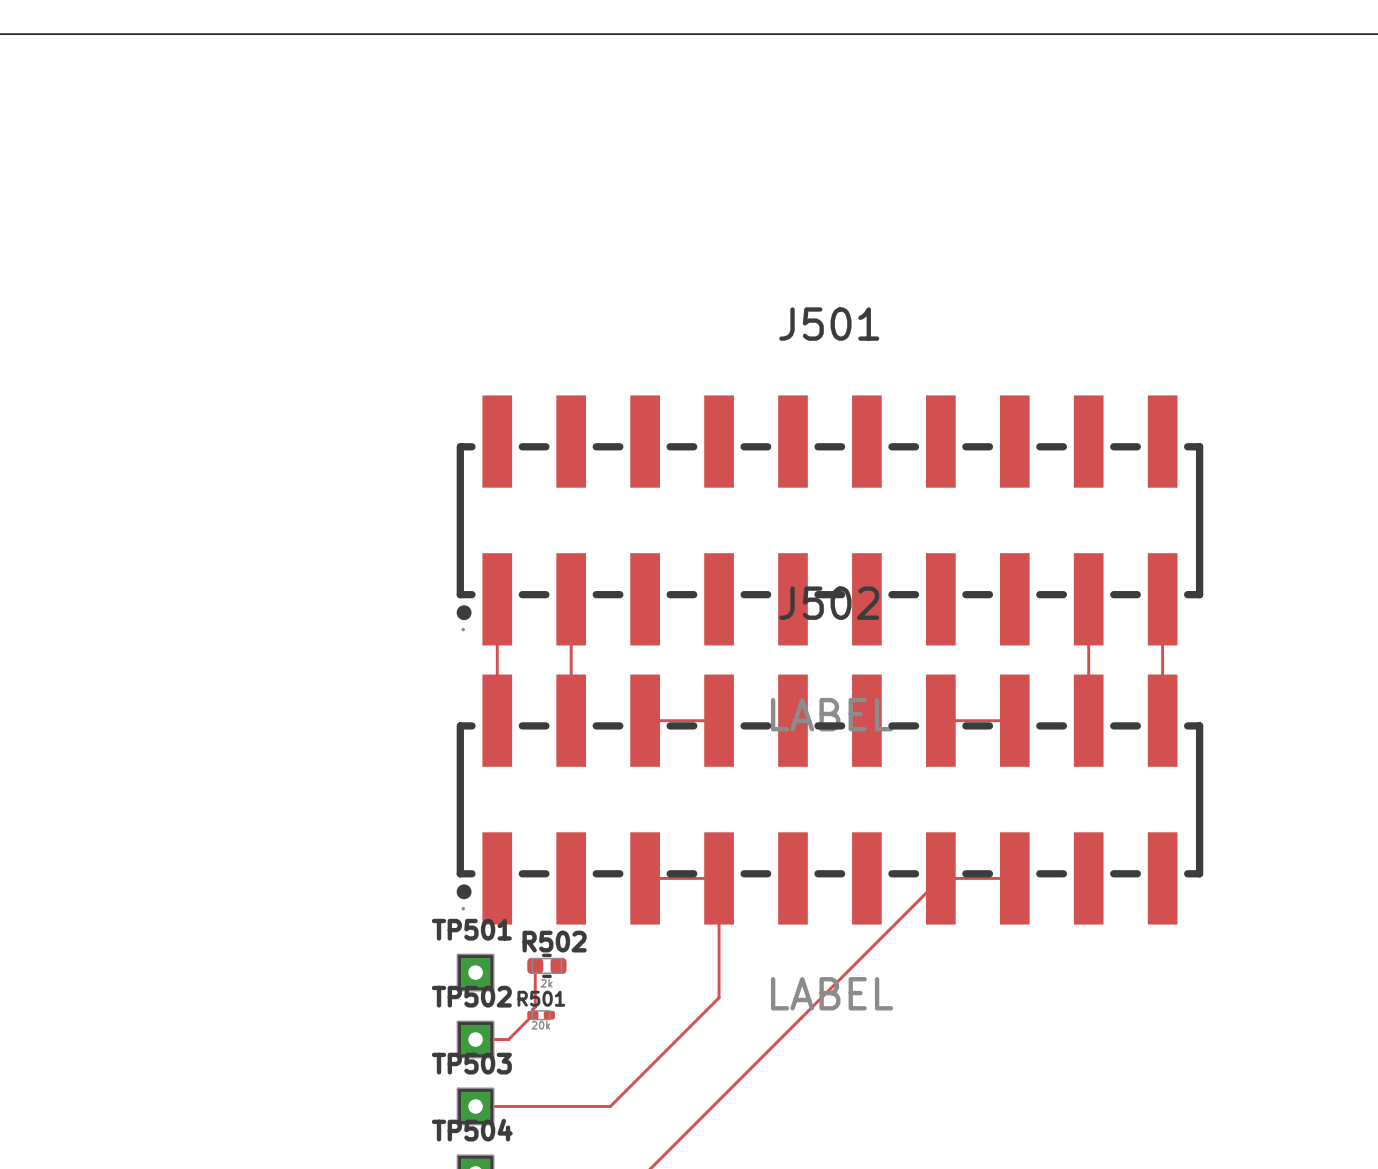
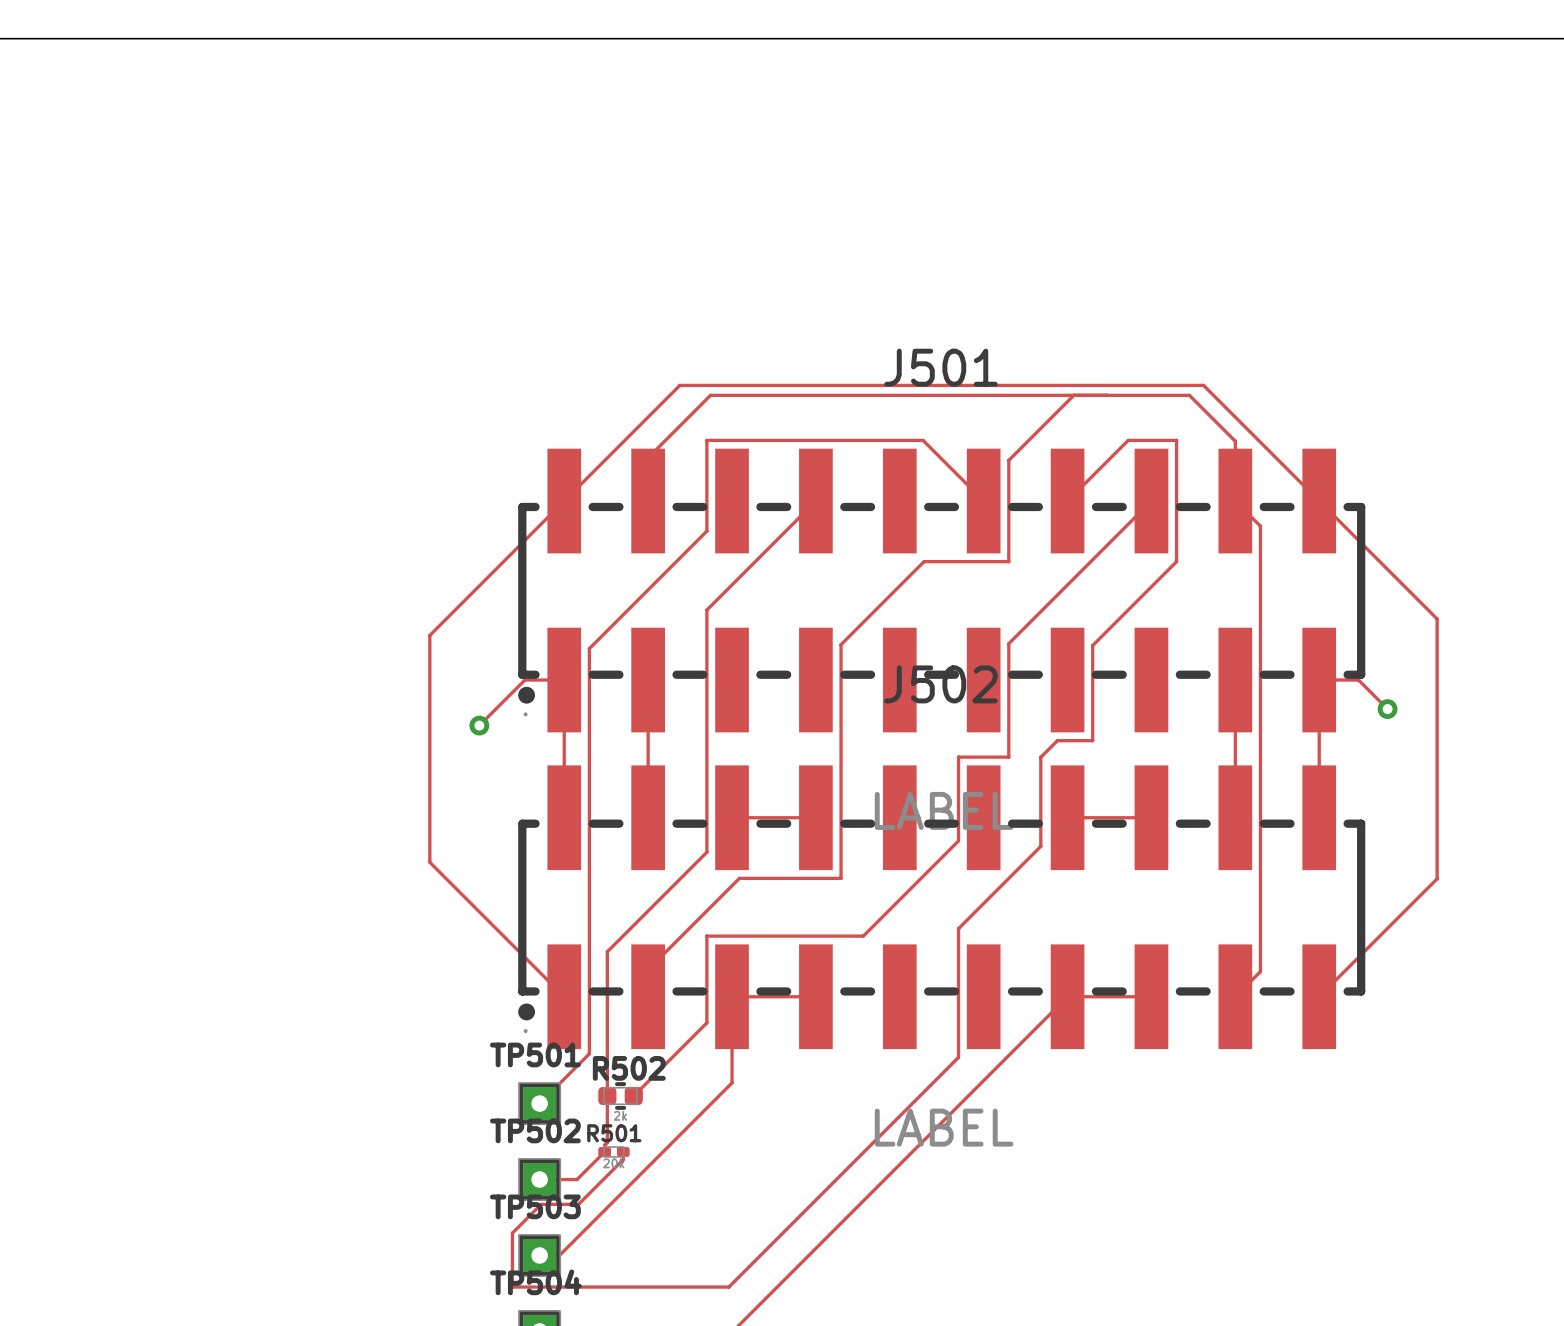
track: none -> (1073, 395) (1008, 460) (1008, 561) (924, 561) (841, 644) (841, 878) (739, 878) (648, 969) (648, 996)
track: none -> (648, 501) (648, 457) (710, 395) (1189, 395) (1235, 441) (1235, 501) (1260, 526) (1260, 971) (1235, 996)
track: none -> (815, 501) (706, 610) (706, 852) (607, 951) (607, 1095)
track: none -> (983, 501) (923, 440) (706, 440) (706, 531) (589, 648) (589, 1053) (539, 1103)
track: none -> (1067, 501) (1128, 440) (1176, 440) (1176, 561) (1092, 645) (1092, 740) (1057, 740) (1040, 757) (1040, 846) (958, 928) (958, 1057) (728, 1287) (512, 1287) (512, 1233) (541, 1204) (578, 1204) (623, 1159) (623, 1151)
track: none -> (1151, 501) (1008, 643) (1008, 757) (958, 757) (958, 840) (863, 936) (706, 936) (706, 1022) (633, 1095)
track: none -> (564, 680) (524, 680) (479, 725)
track: none -> (1319, 680) (1358, 680) (1387, 709)
via: none -> (1387, 709)
via: none -> (479, 725)
track: none -> (564, 996) (429, 862) (429, 635) (679, 385) (1203, 385) (1437, 618) (1437, 878) (1319, 996)
track: (719, 878) (719, 997) (610, 1106) (493, 1106) -> (732, 996) (732, 1082) (559, 1255)

